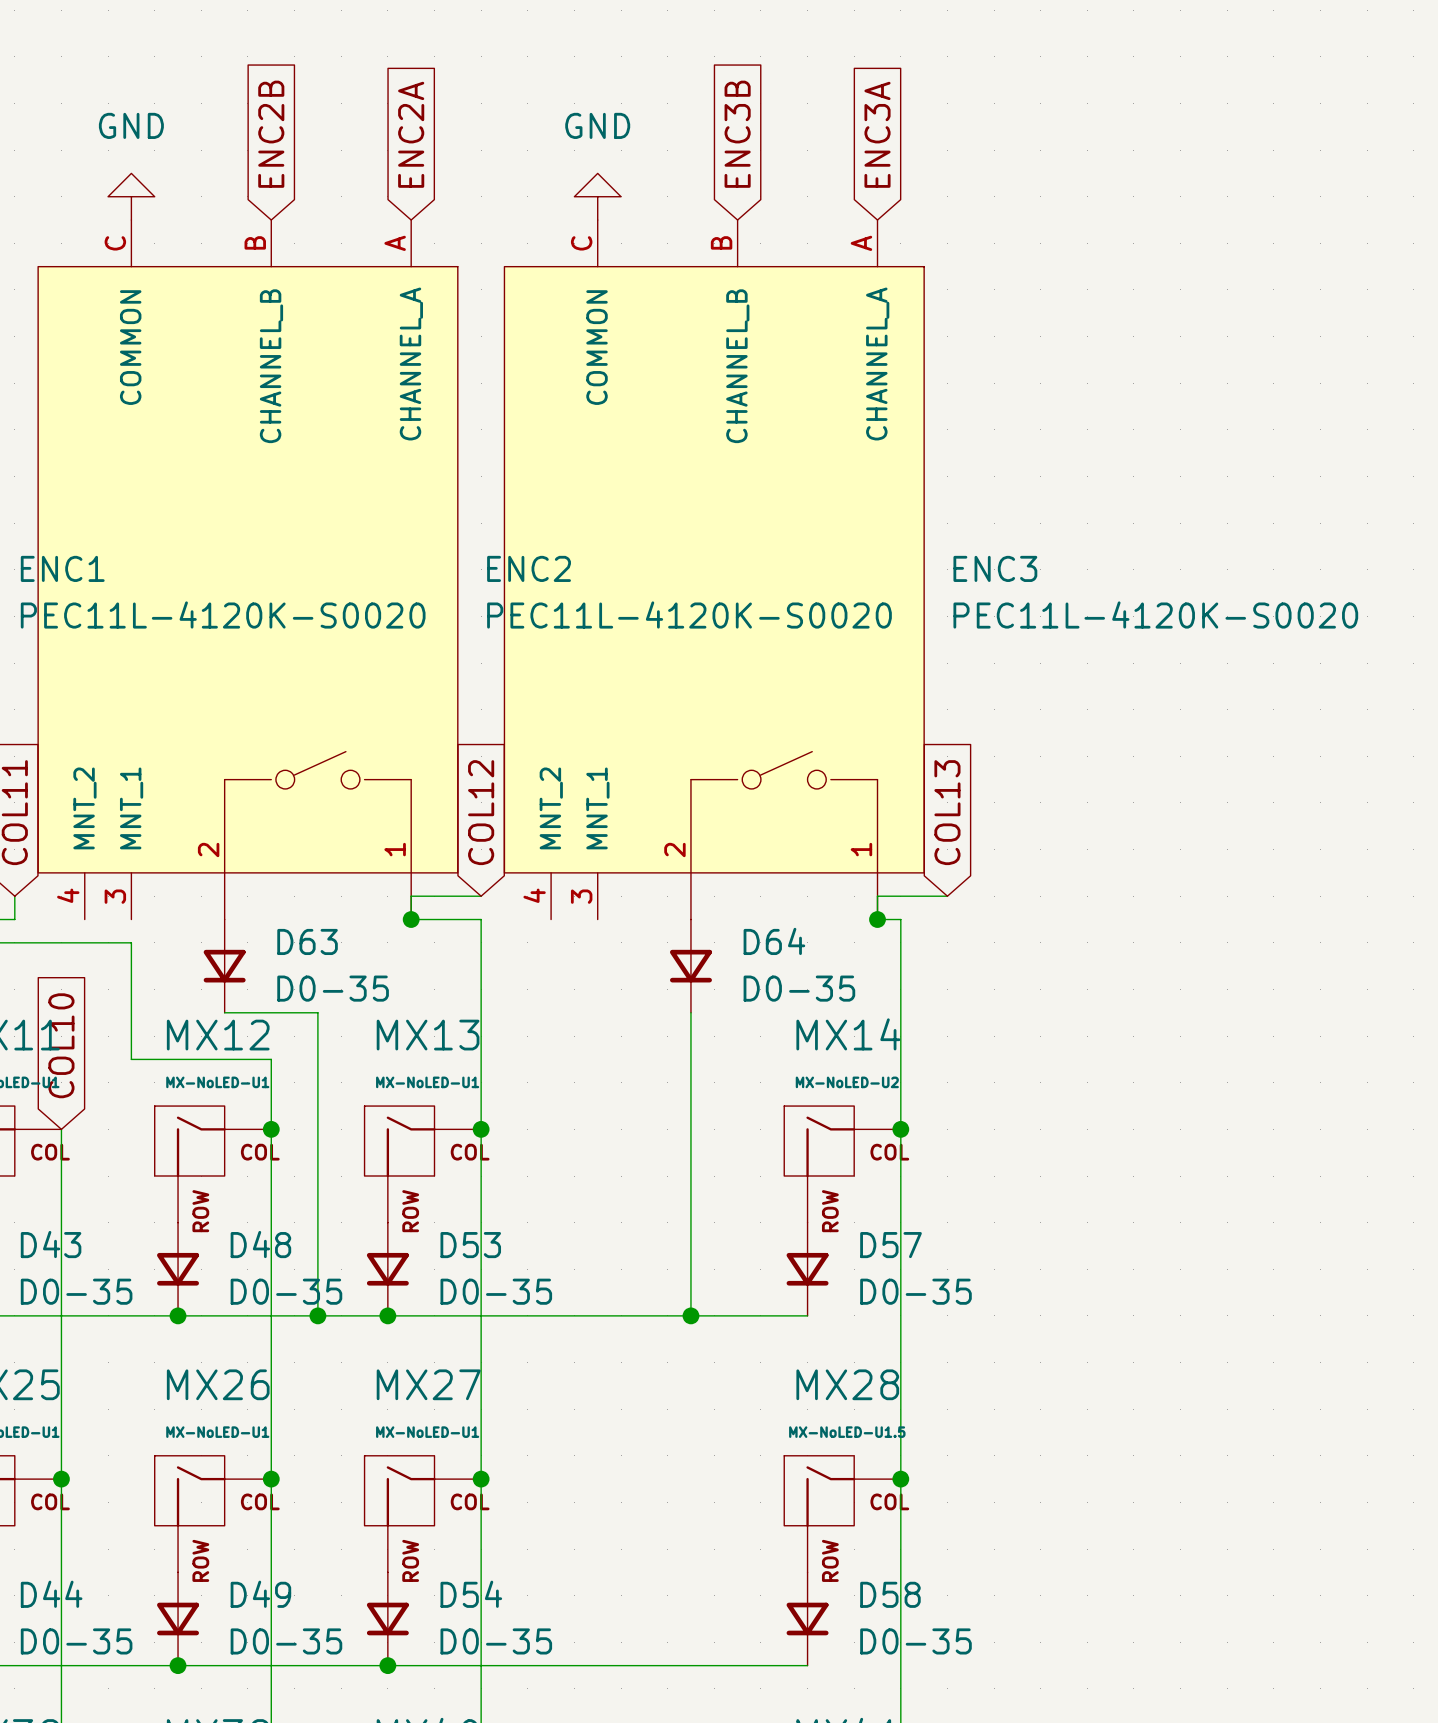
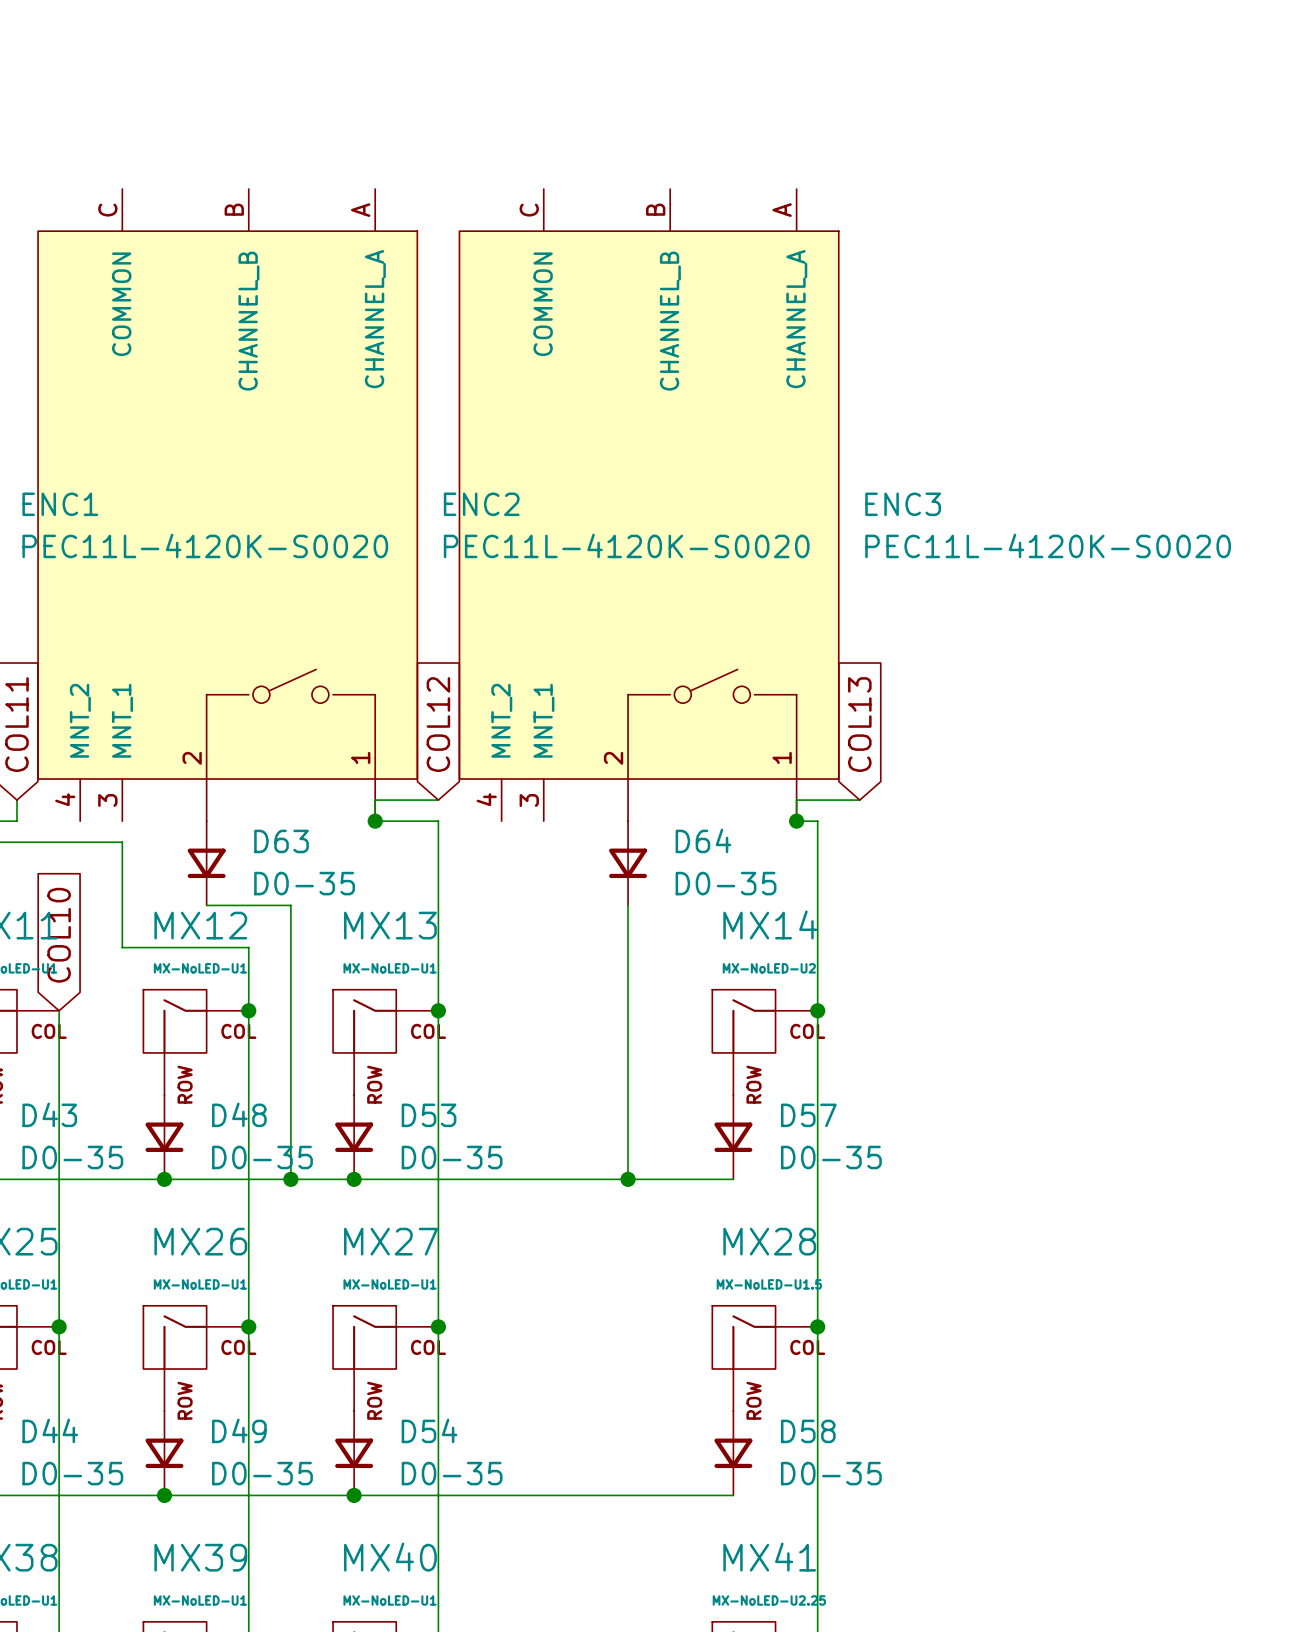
global label: ENC2B (271, 134) -> none
global label: ENC2A (411, 134) -> none
global label: ENC3B (737, 134) -> none
global label: ENC3A (877, 134) -> none
power symbol: GND (131, 196) -> none
power symbol: GND (597, 196) -> none

